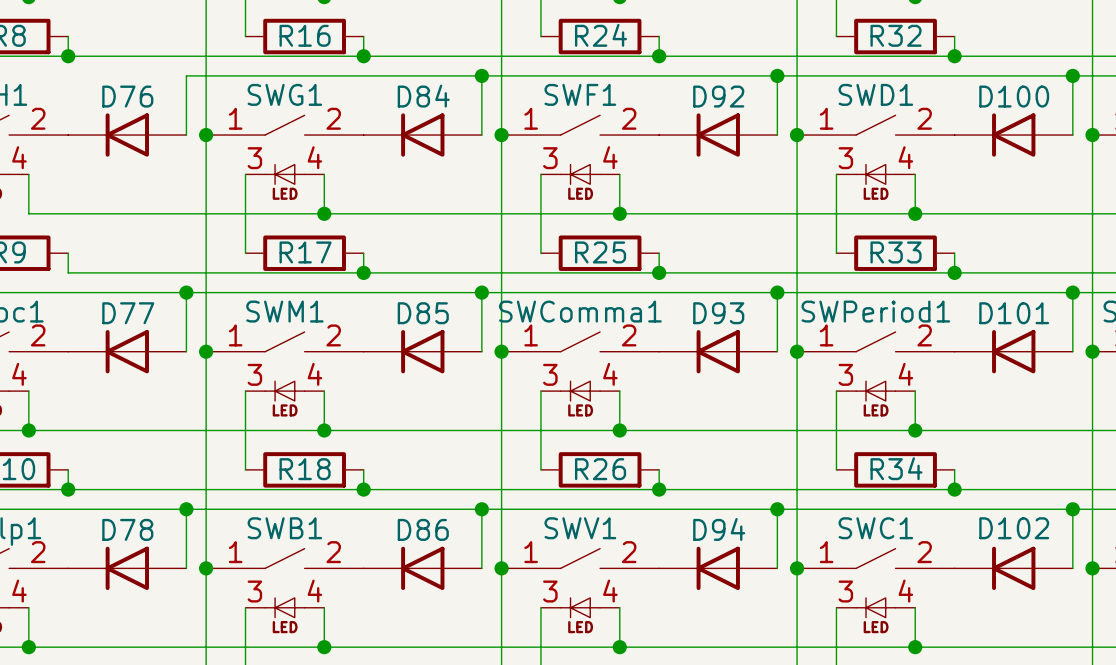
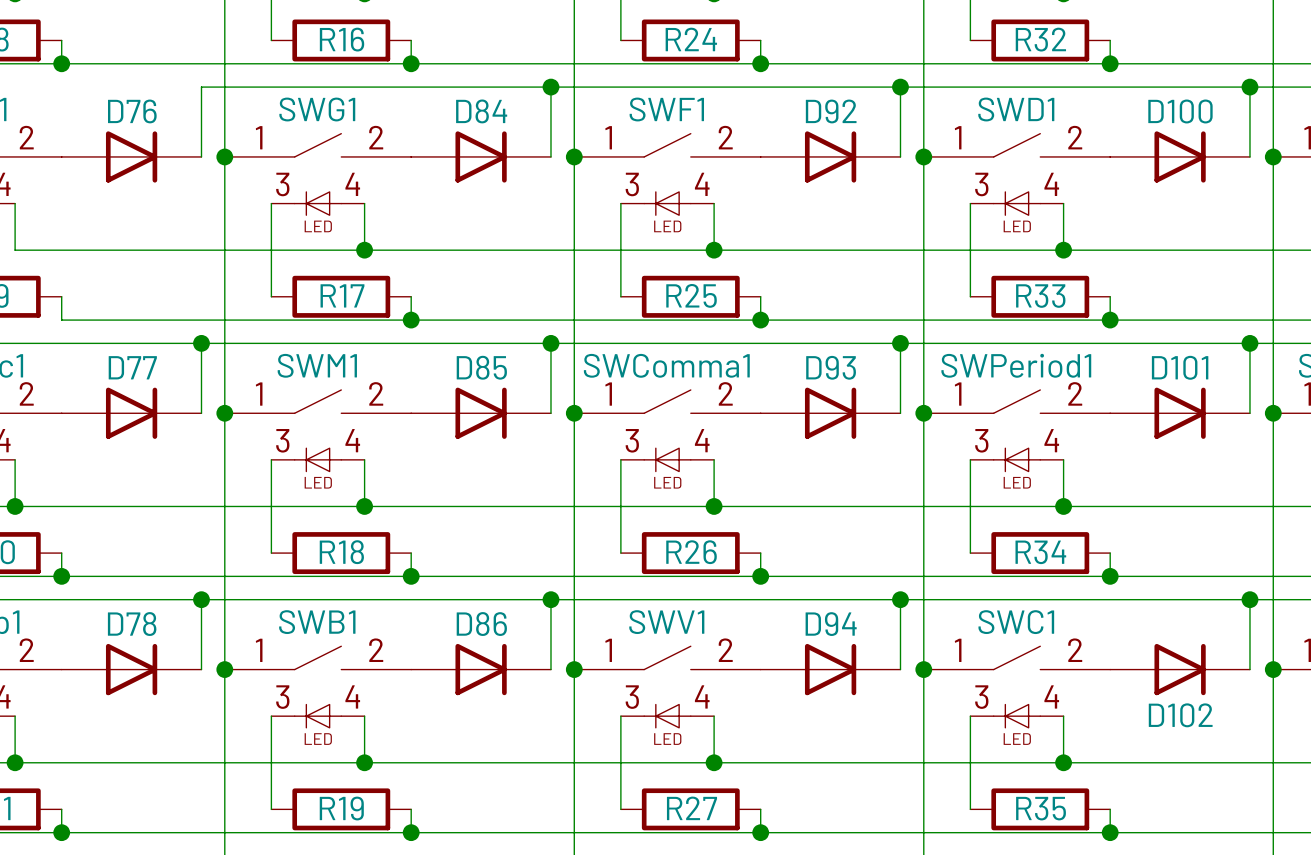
D76 rotation: 0° (127, 135) -> 180° (131, 156)
D84 rotation: 0° (422, 135) -> 180° (481, 156)
D92 rotation: 0° (718, 135) -> 180° (830, 156)
D100 rotation: 0° (1013, 135) -> 180° (1180, 156)
D77 rotation: 0° (127, 351) -> 180° (131, 413)
D85 rotation: 0° (422, 351) -> 180° (481, 413)
D93 rotation: 0° (718, 351) -> 180° (830, 413)
D101 rotation: 0° (1013, 351) -> 180° (1180, 413)
D78 rotation: 0° (127, 568) -> 180° (131, 669)
D86 rotation: 0° (422, 568) -> 180° (481, 669)
D94 rotation: 0° (718, 568) -> 180° (830, 669)
D102 rotation: 0° (1013, 568) -> 180° (1180, 669)

